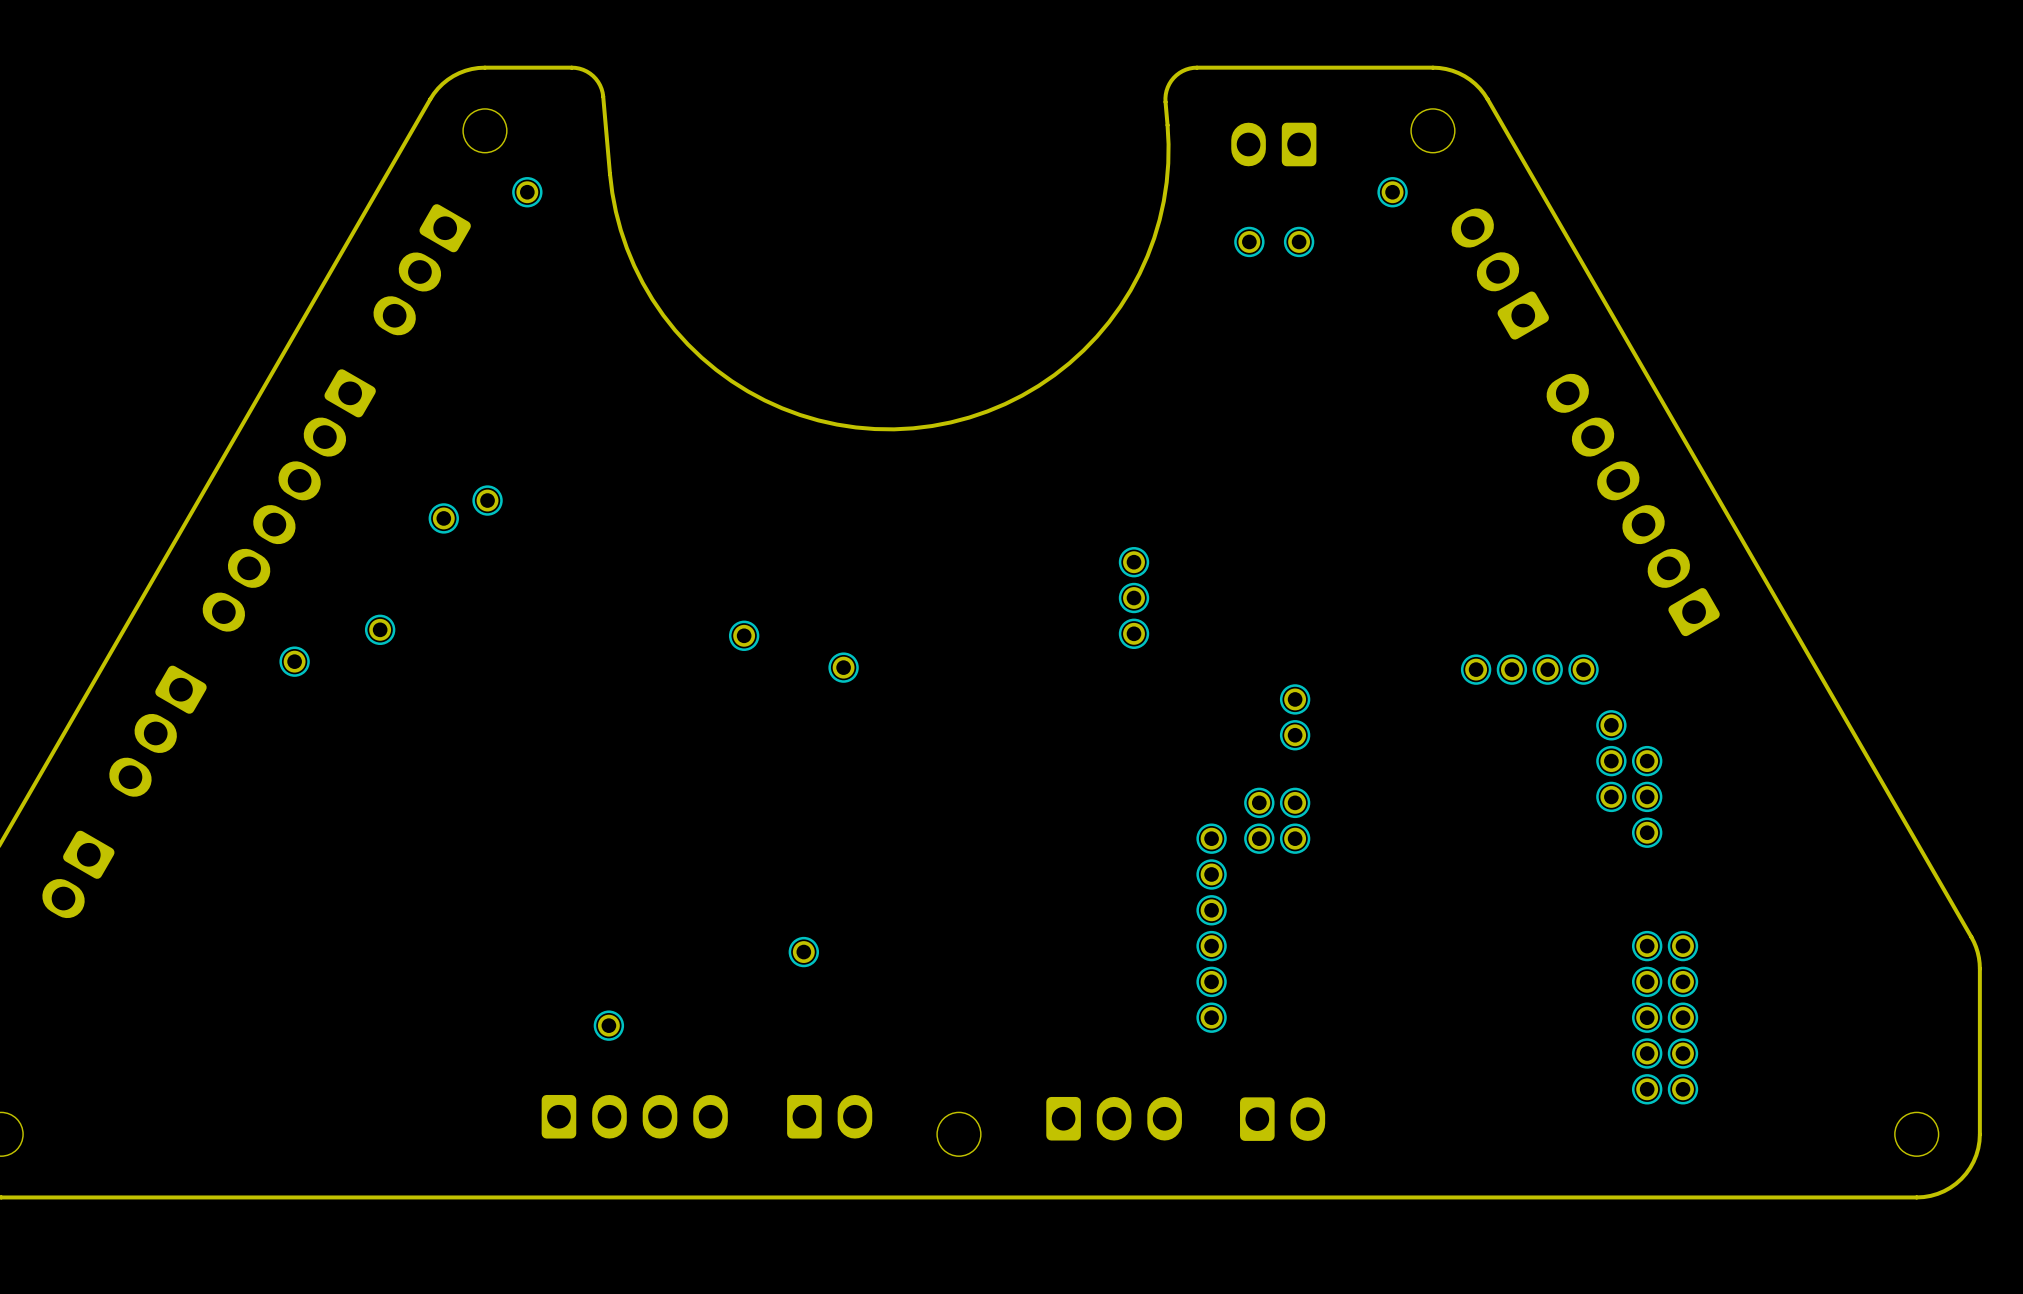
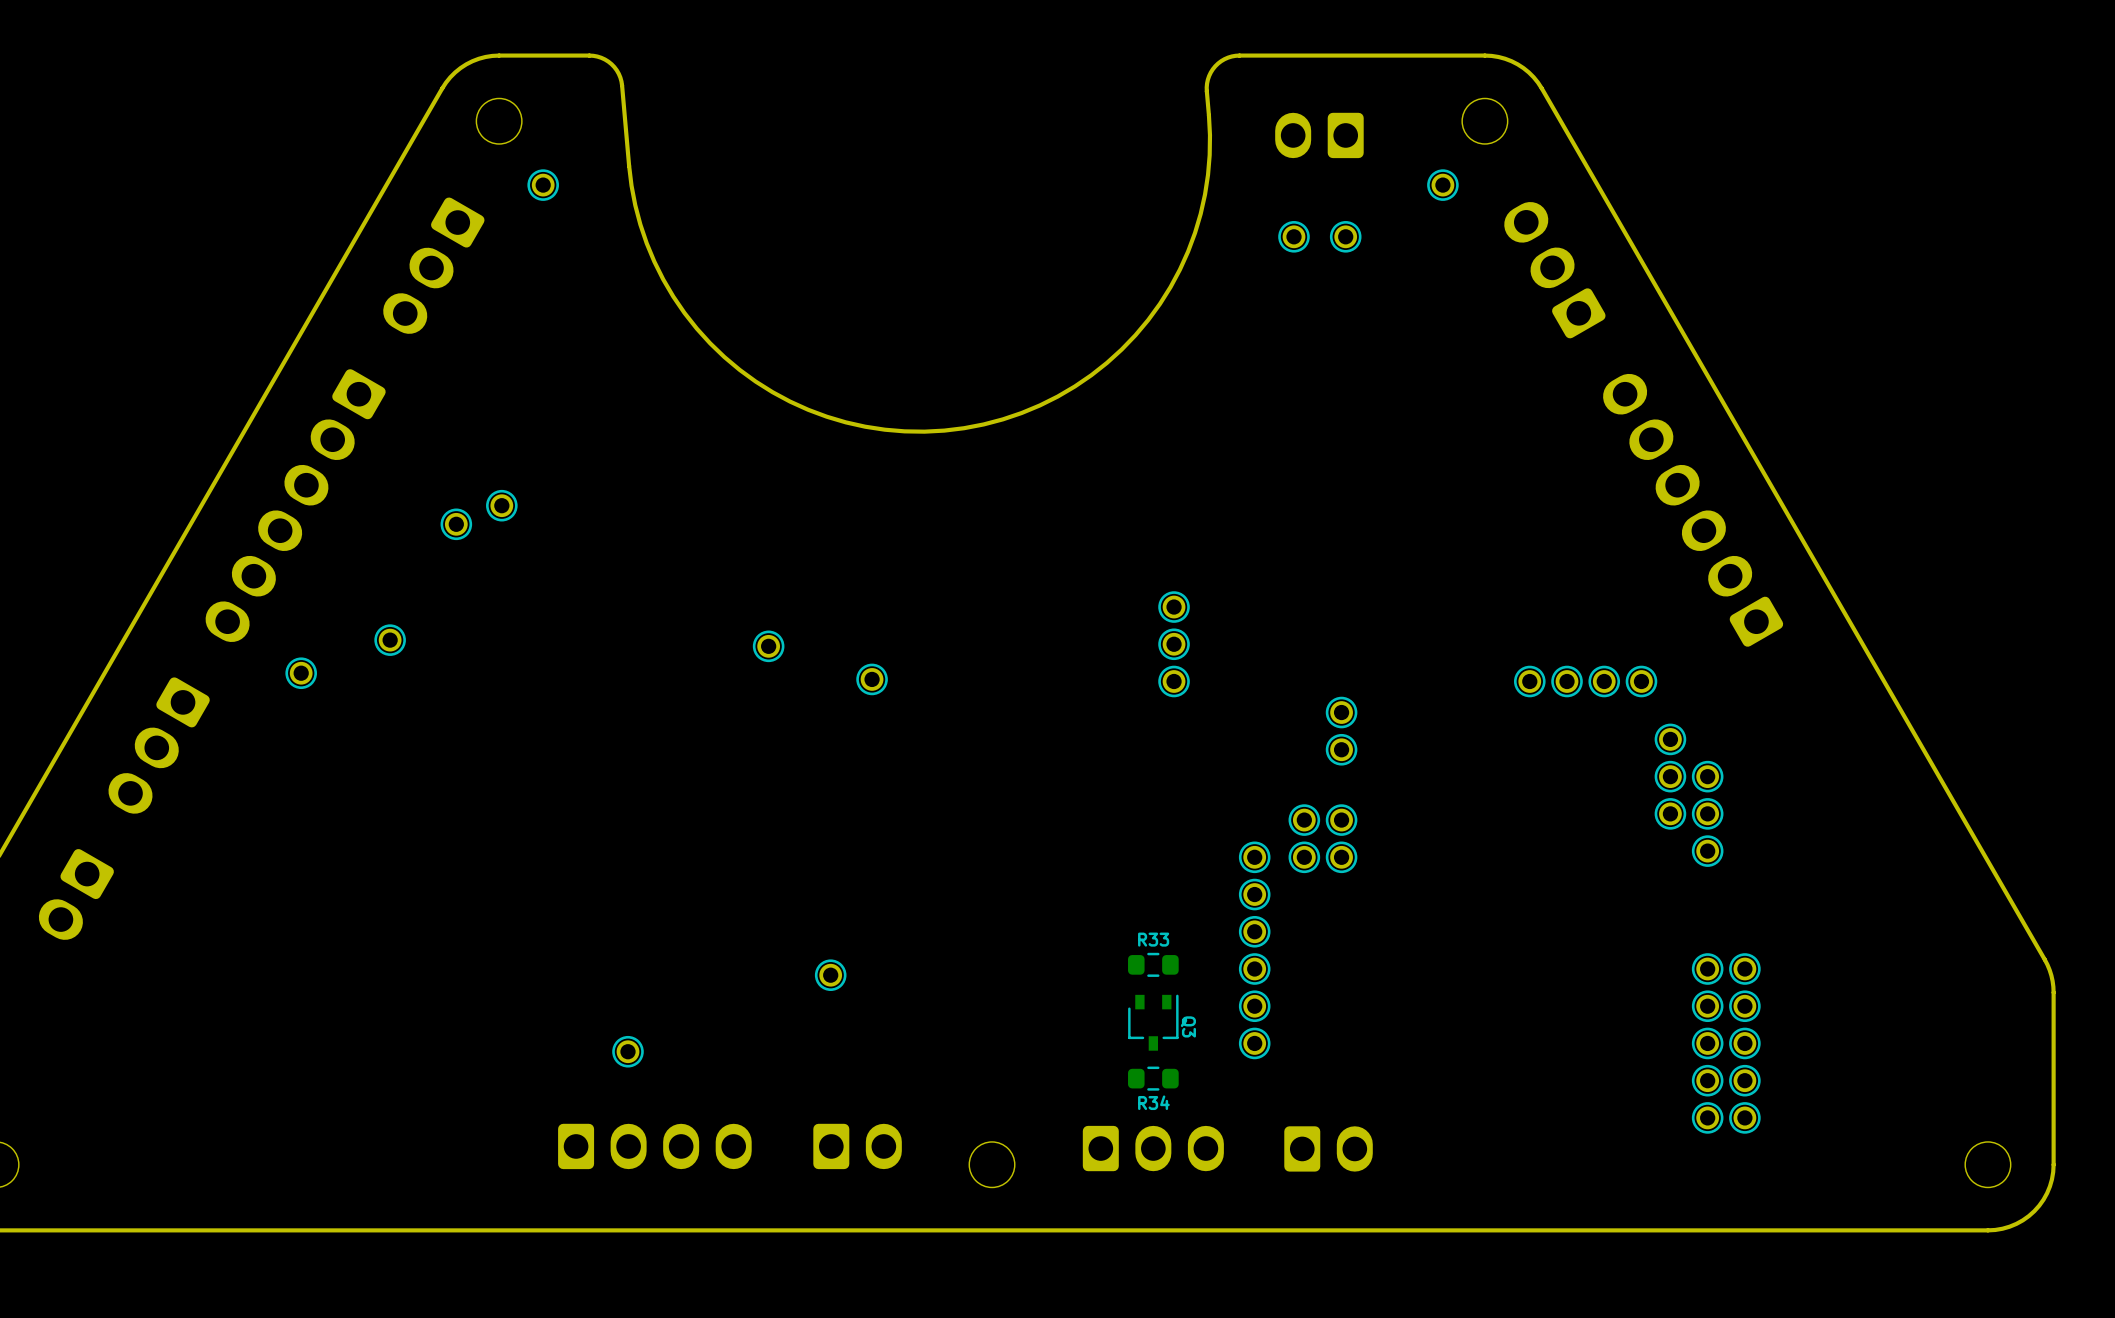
part position: (1134, 562) -> (1174, 681)
R33: none -> (1153, 964)
Q3: none -> (1153, 1022)
R34: none -> (1153, 1078)

